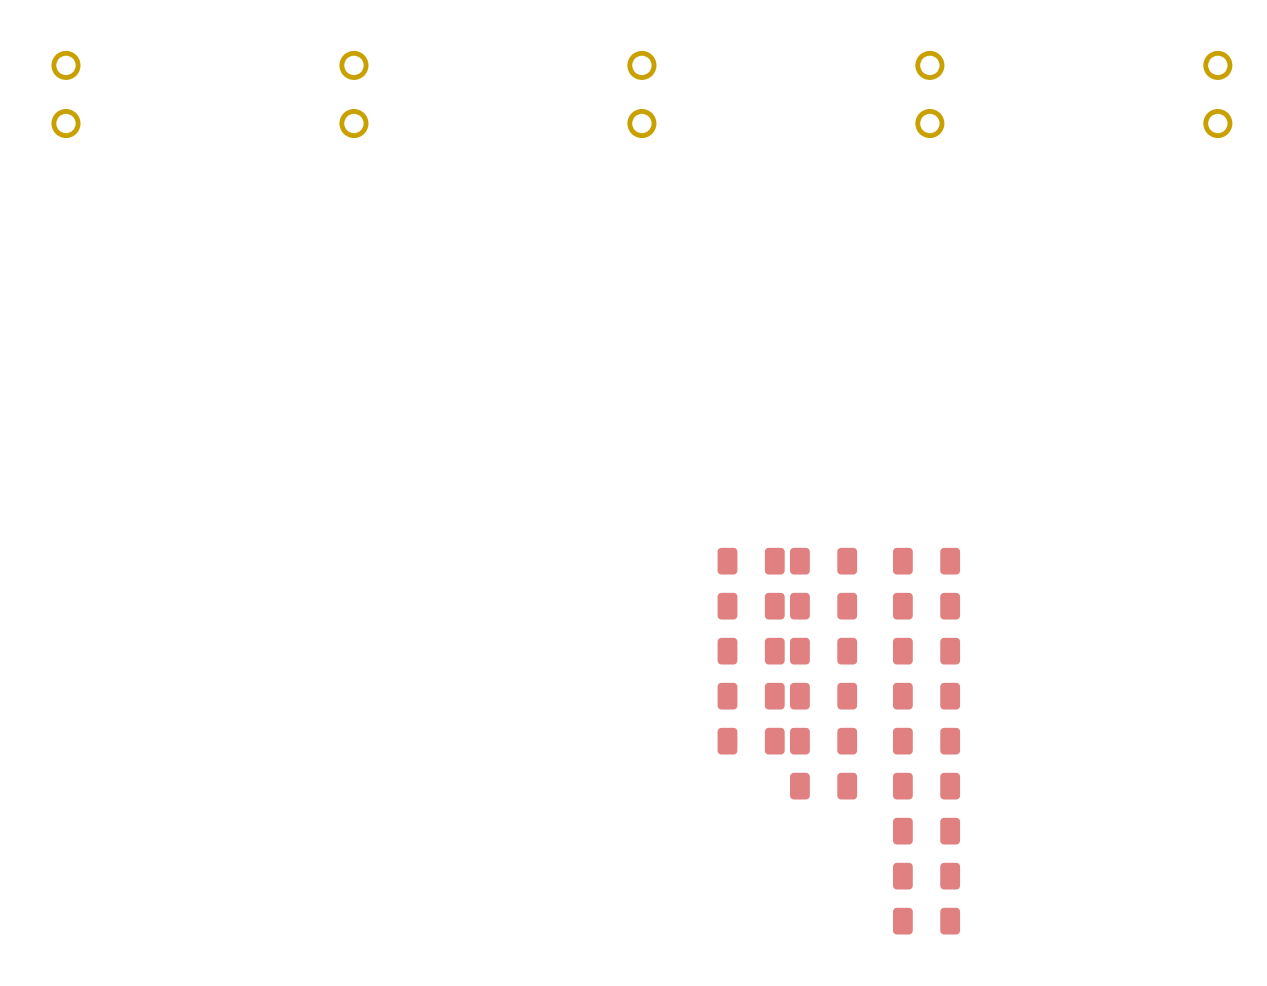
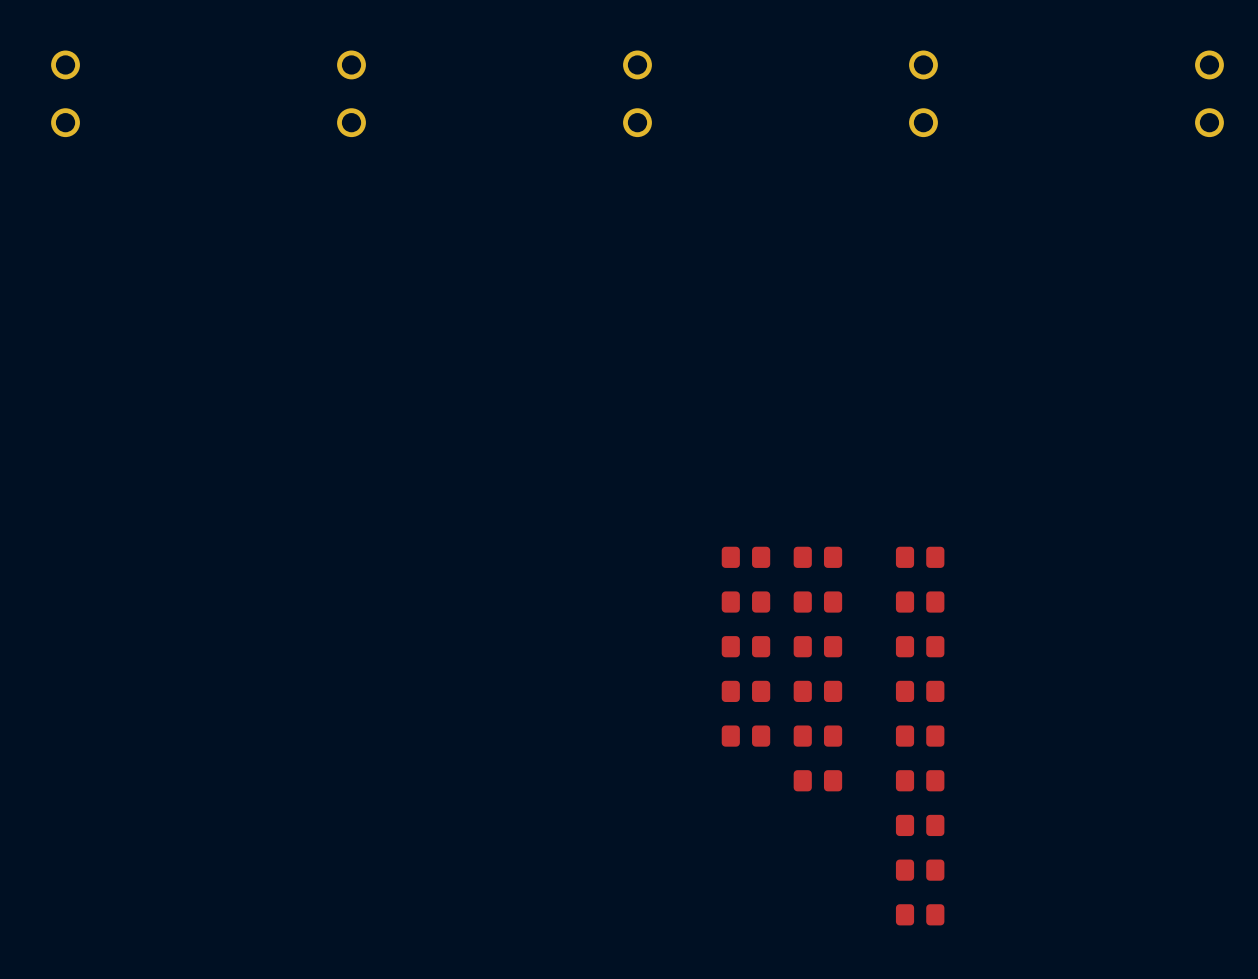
part footprint: [717, 547, 785, 575] -> [721, 546, 771, 568]
part footprint: [790, 547, 858, 575] -> [793, 546, 843, 568]
part footprint: [892, 547, 961, 575] -> [895, 546, 945, 568]
part footprint: [717, 592, 785, 620] -> [721, 591, 771, 613]
part footprint: [790, 592, 858, 620] -> [793, 591, 843, 613]
part footprint: [892, 592, 961, 620] -> [895, 591, 945, 613]
part footprint: [717, 637, 785, 665] -> [721, 636, 771, 658]
part footprint: [790, 637, 858, 665] -> [793, 636, 843, 658]
part footprint: [892, 637, 961, 665] -> [895, 636, 945, 658]
part footprint: [717, 682, 785, 710] -> [721, 680, 771, 702]
part footprint: [790, 682, 858, 710] -> [793, 680, 843, 702]
part footprint: [892, 682, 961, 710] -> [895, 680, 945, 702]
part footprint: [717, 727, 785, 755] -> [721, 725, 771, 747]
part footprint: [790, 727, 858, 755] -> [793, 725, 843, 747]
part footprint: [892, 727, 961, 755] -> [895, 725, 945, 747]
part footprint: [790, 772, 858, 800] -> [793, 770, 843, 792]
part footprint: [892, 772, 961, 800] -> [895, 770, 945, 792]
part footprint: [892, 817, 961, 845] -> [895, 814, 945, 837]
part footprint: [892, 862, 961, 890] -> [895, 859, 945, 881]
part footprint: [892, 907, 961, 935] -> [895, 904, 945, 926]

